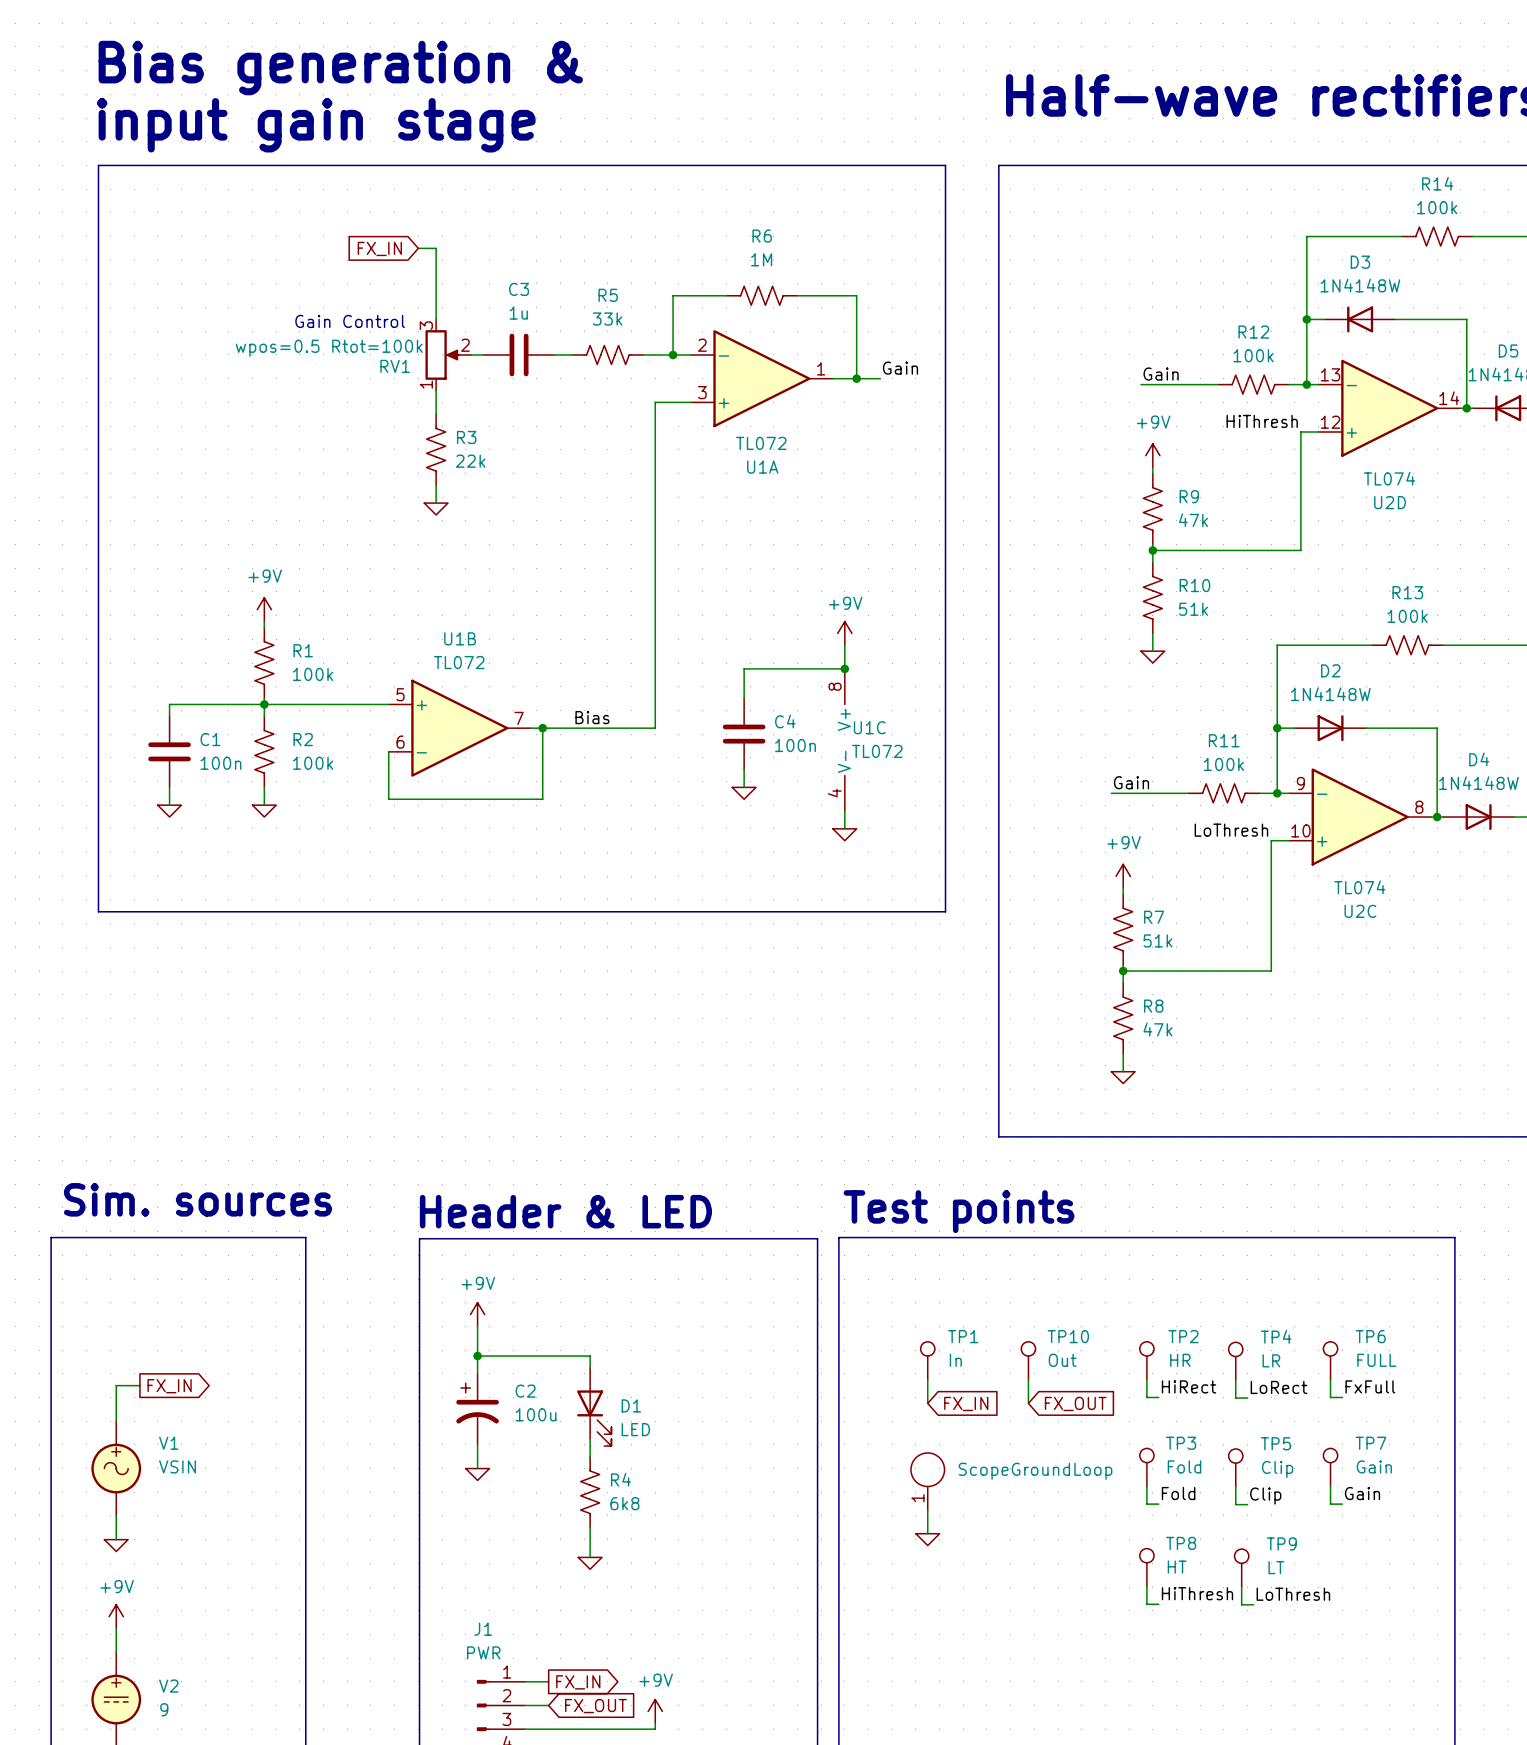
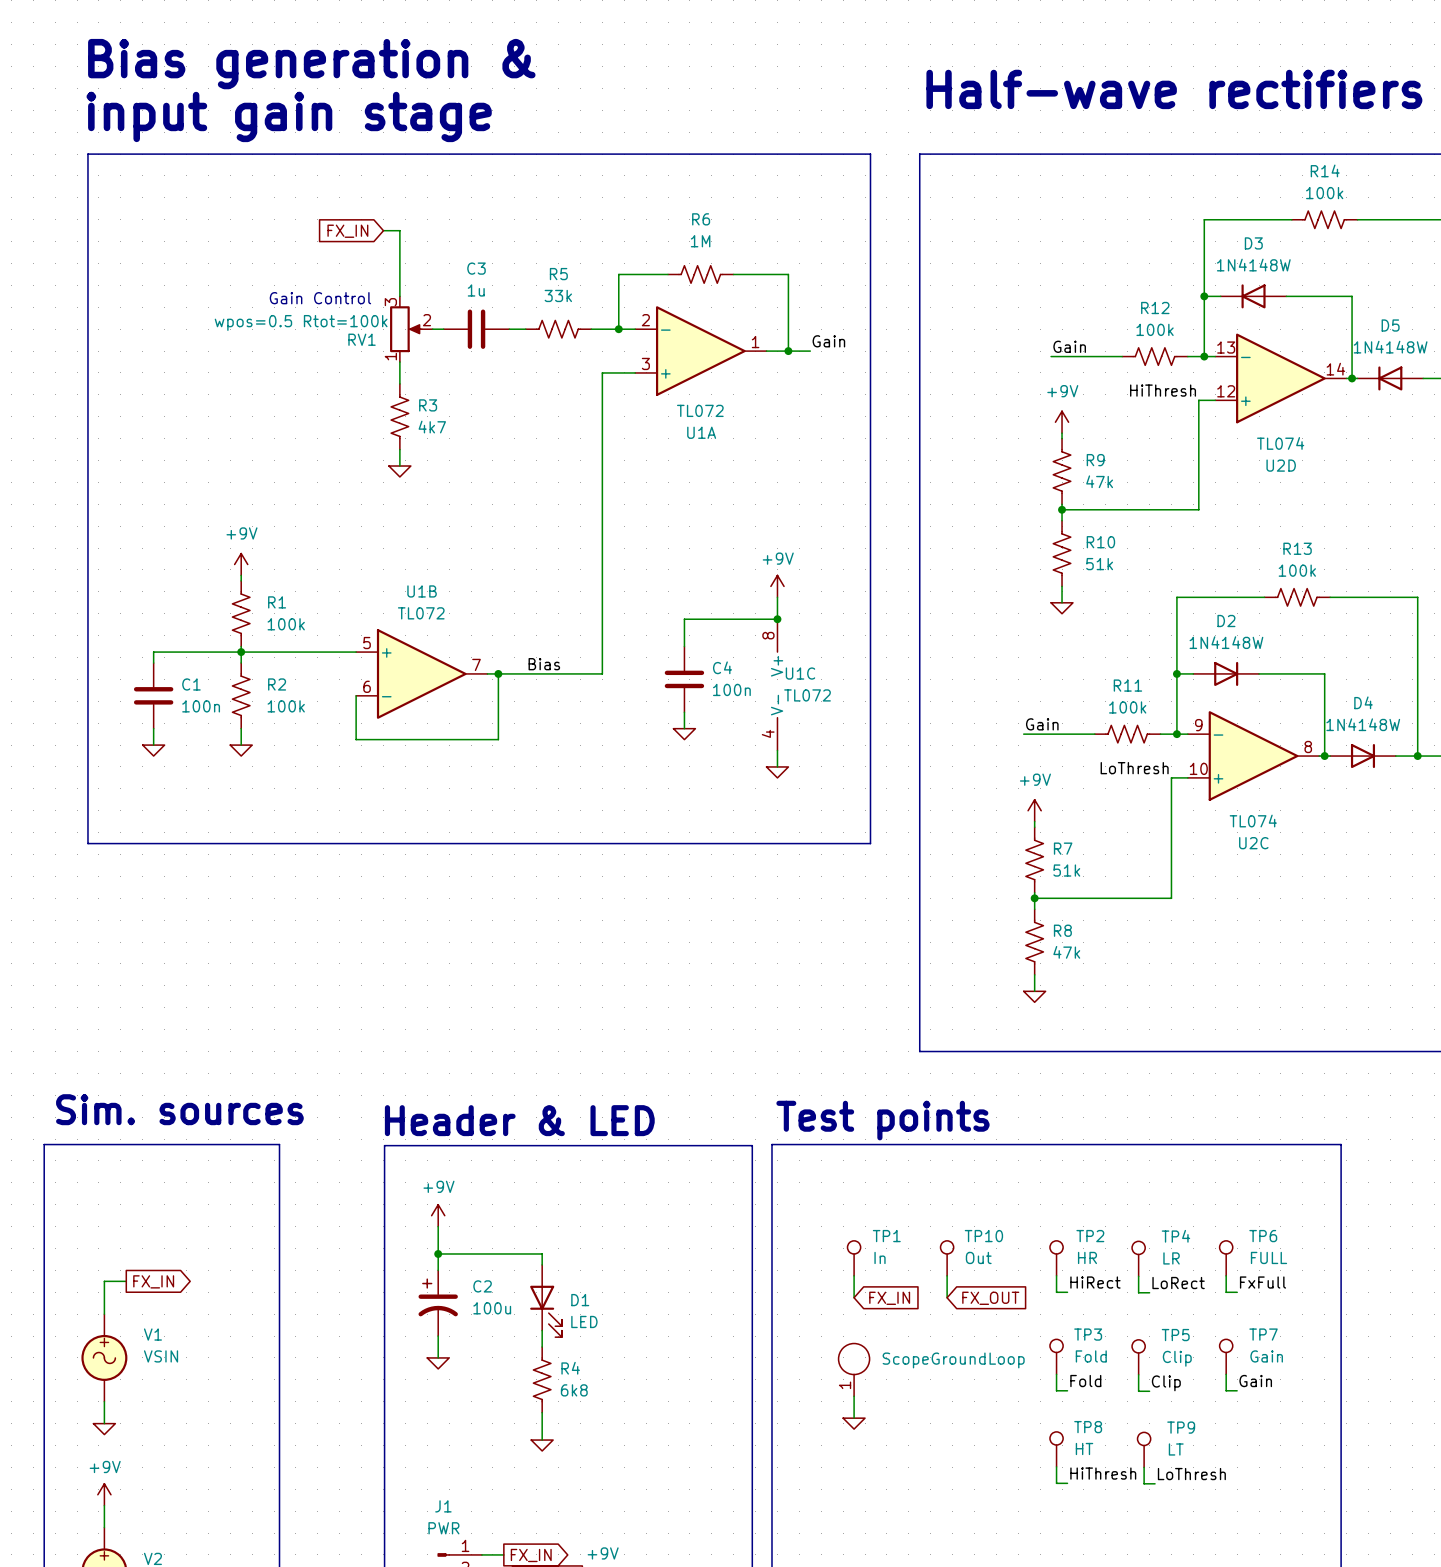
R3 value: 22k (470, 461) -> 4k7 (432, 427)

